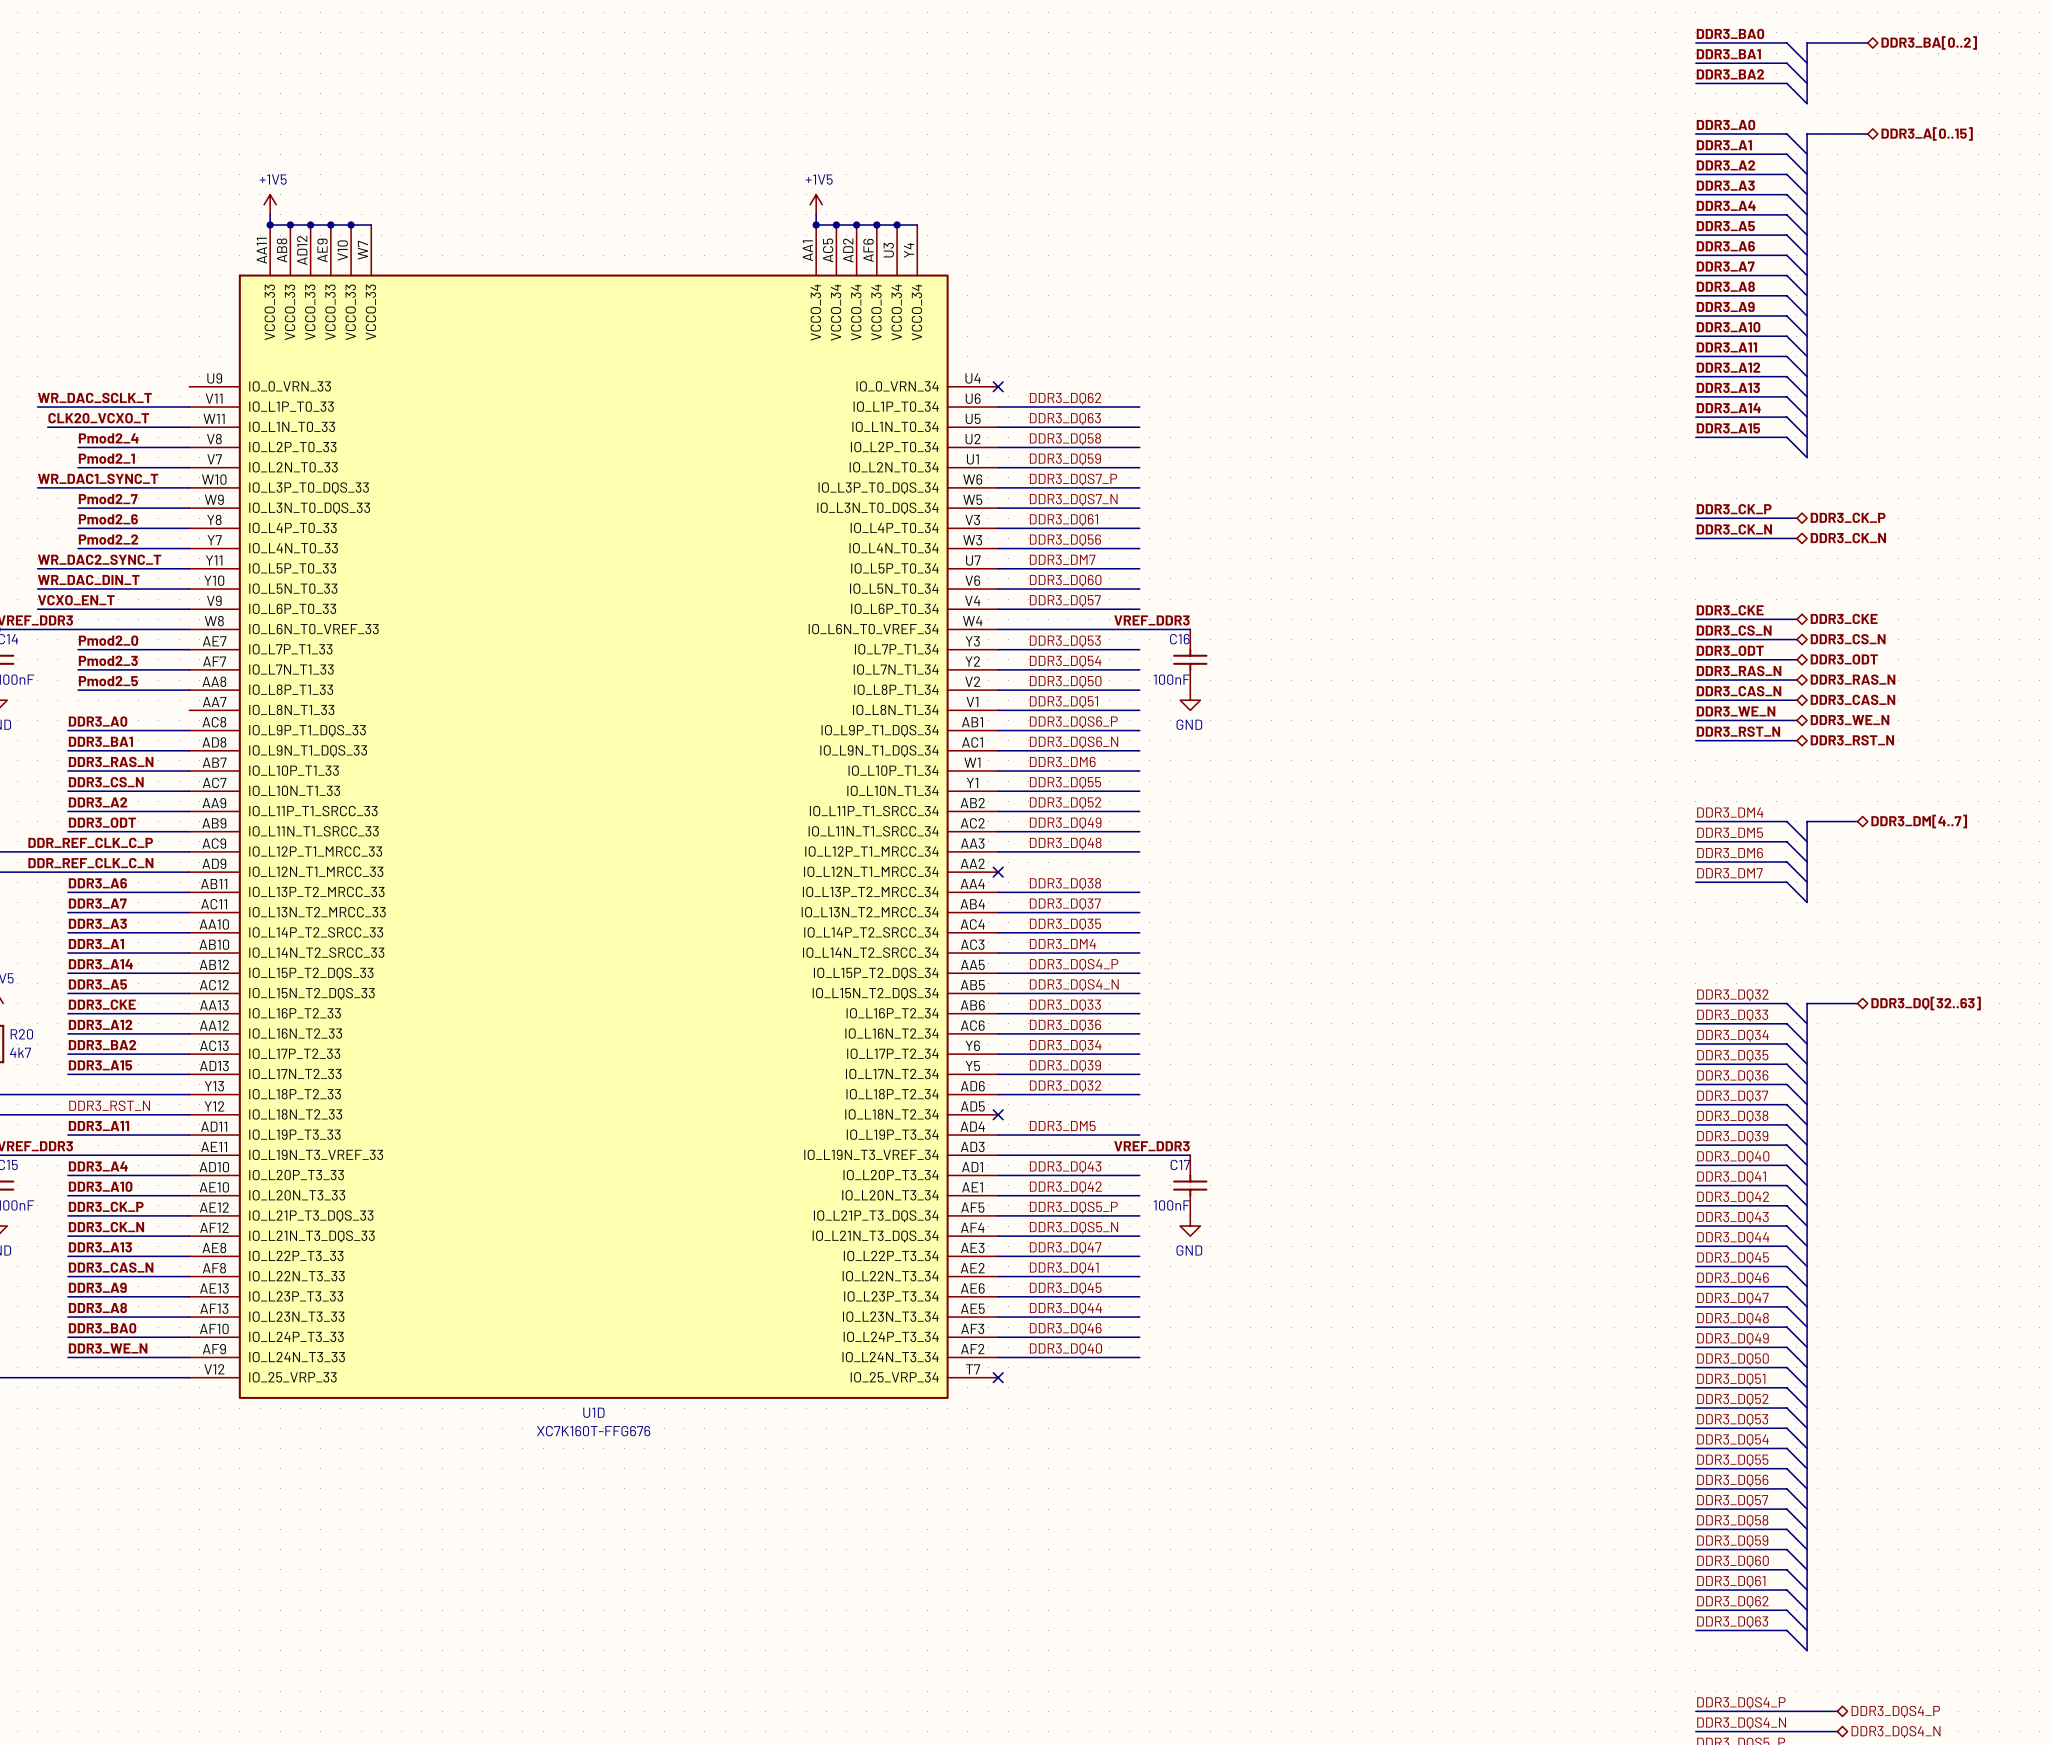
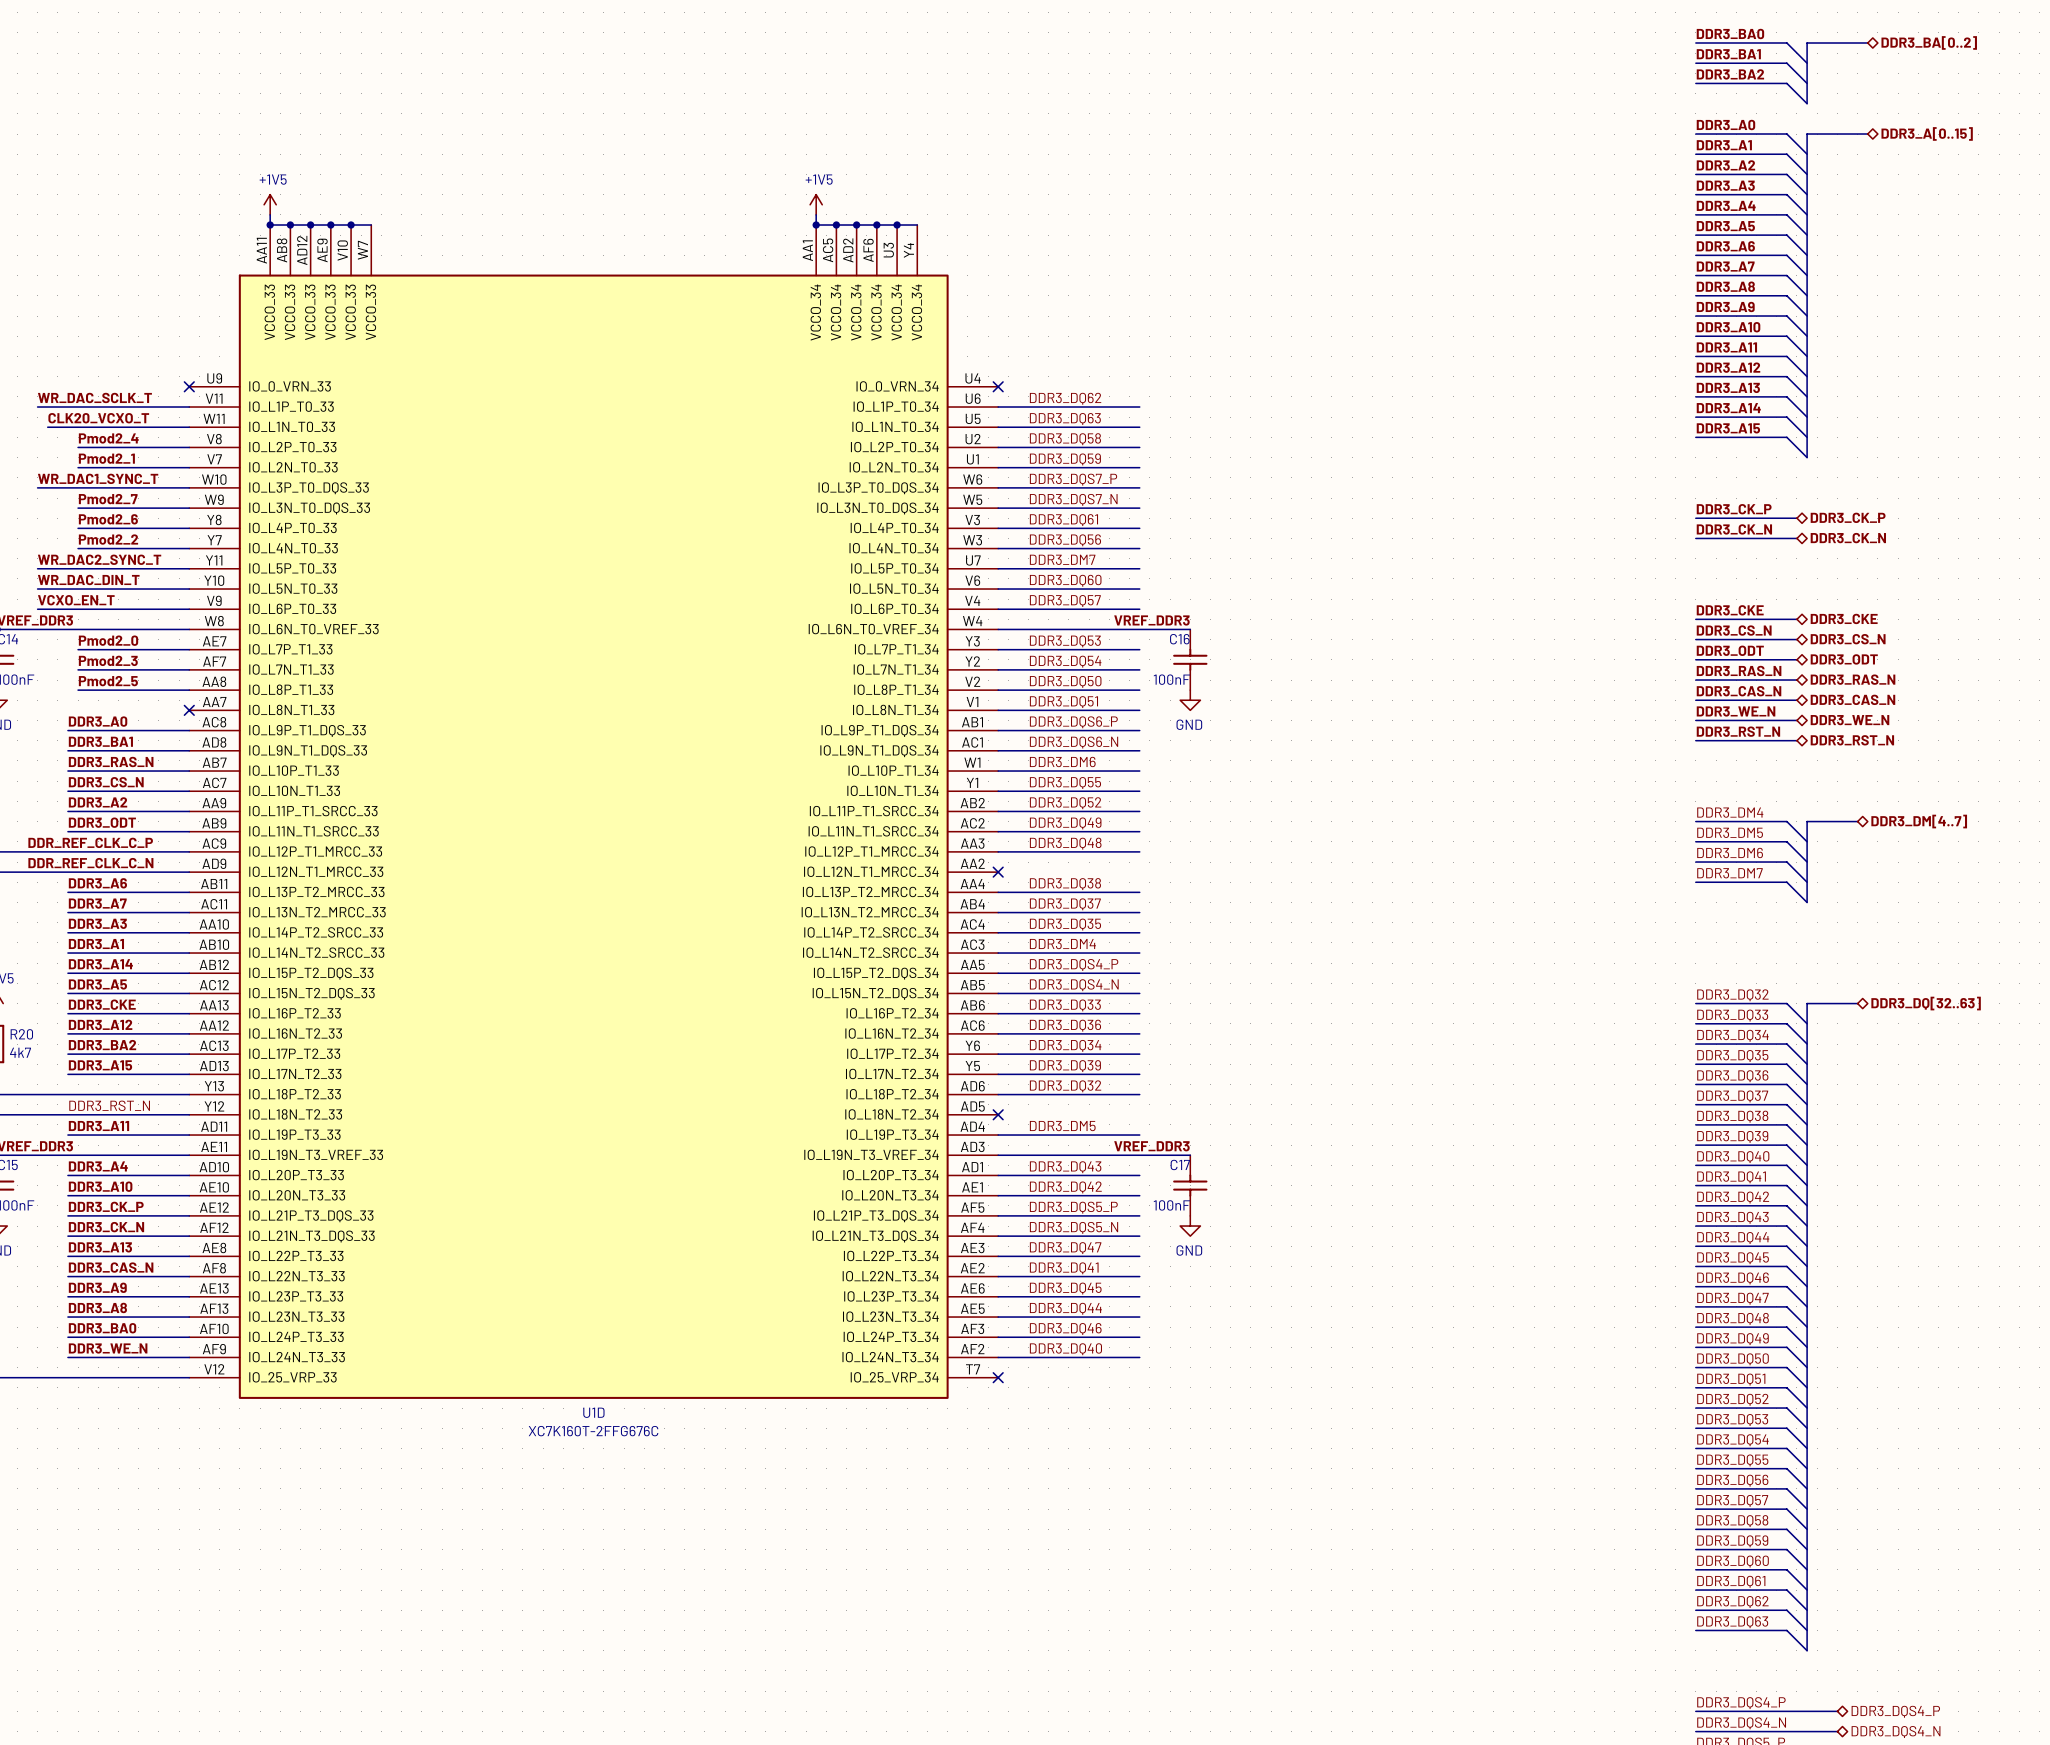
no-connect mark: none -> (189, 386)
no-connect mark: none -> (189, 710)
U1D value: XC7K160T-FFG676 (593, 1431) -> XC7K160T-2FFG676C (593, 1431)

